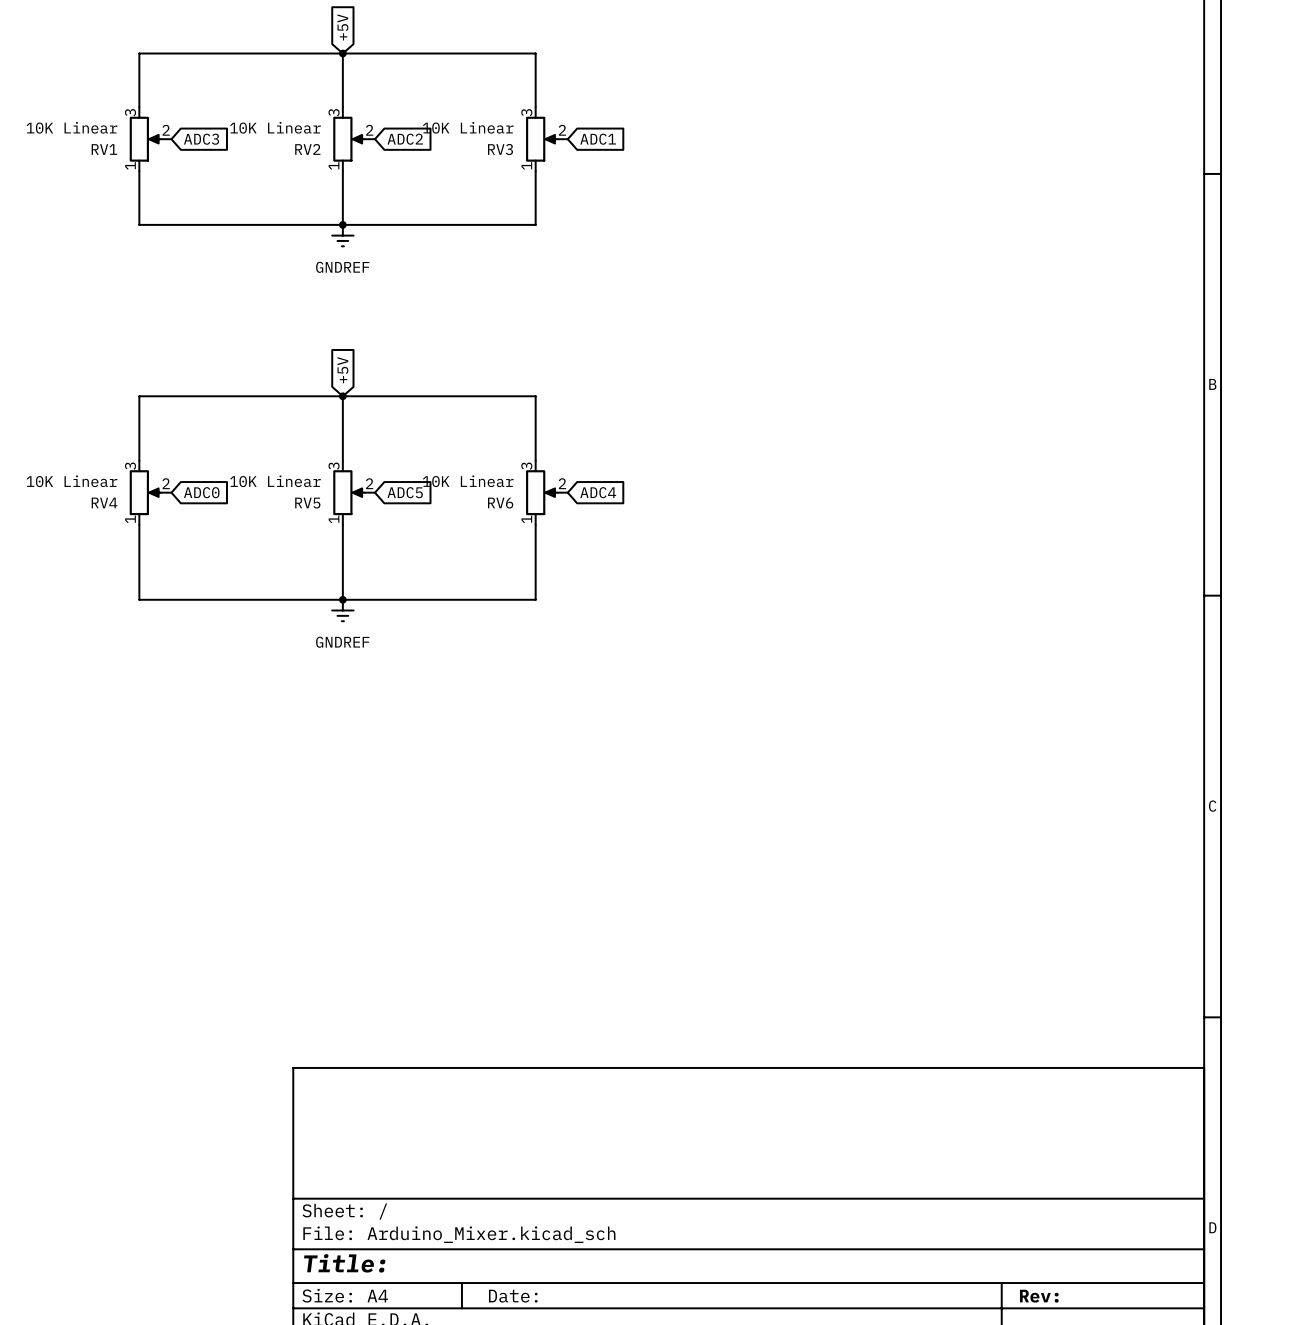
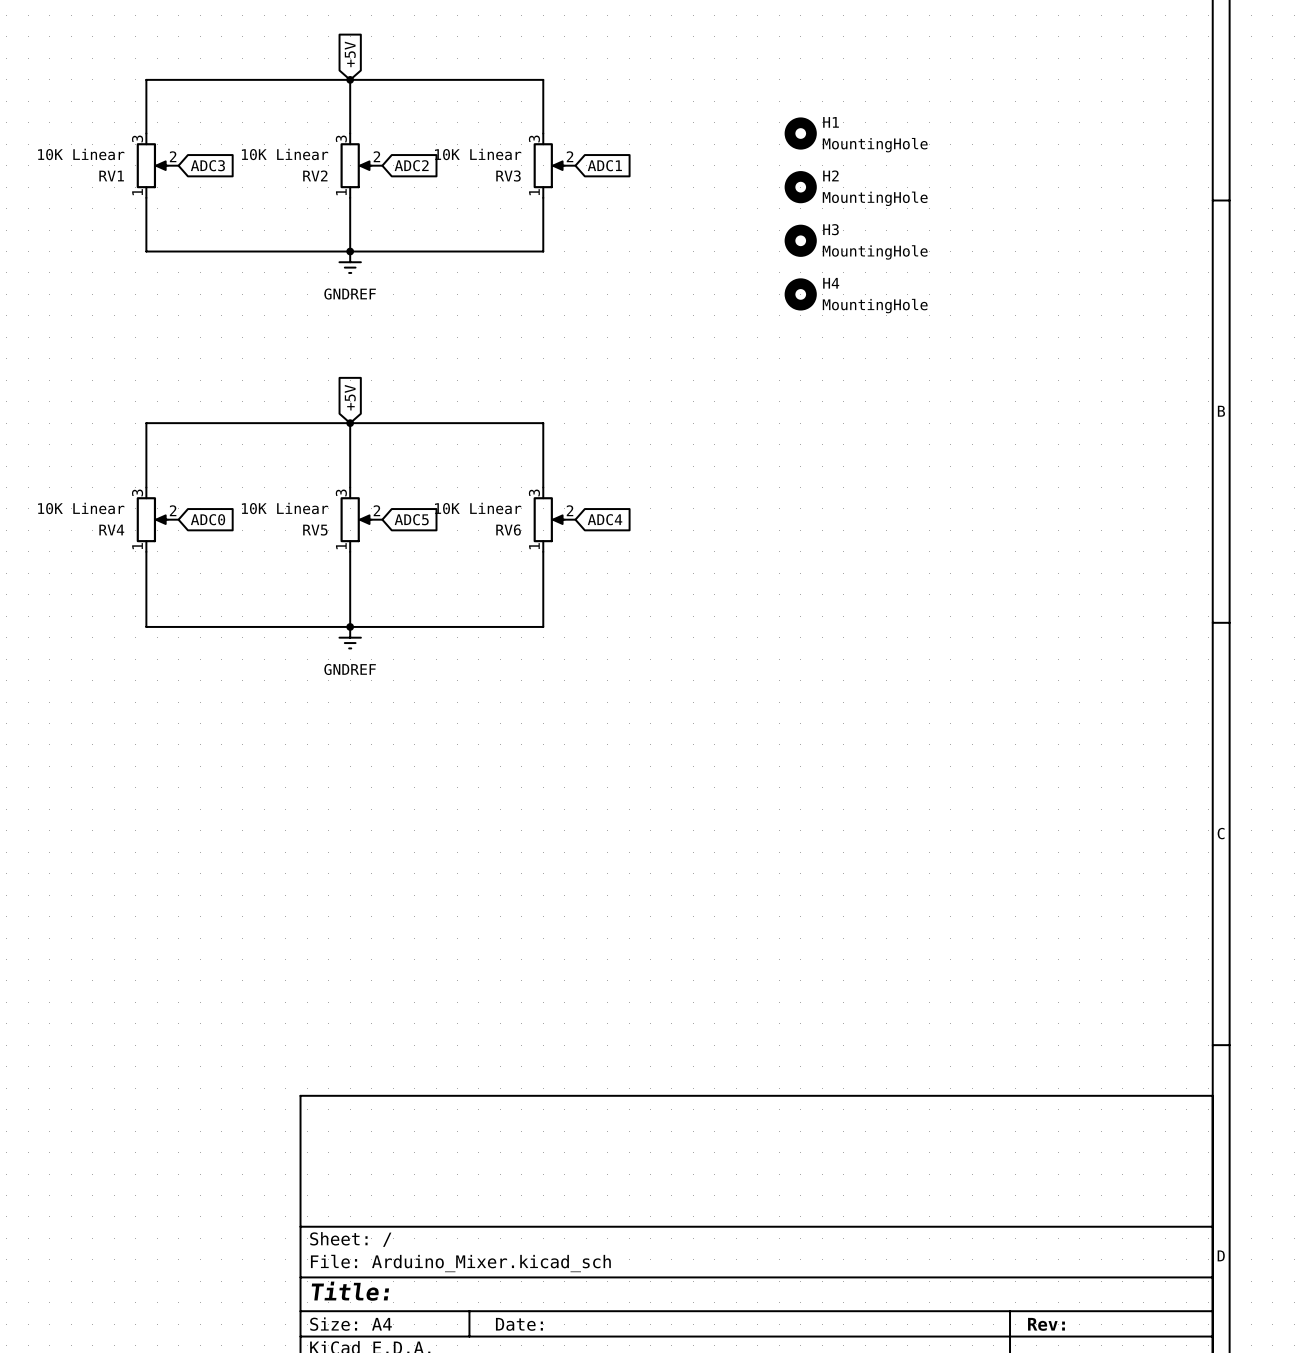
H1: none -> MountingHole (800, 133)
H2: none -> MountingHole (800, 187)
H3: none -> MountingHole (800, 240)
H4: none -> MountingHole (800, 294)

